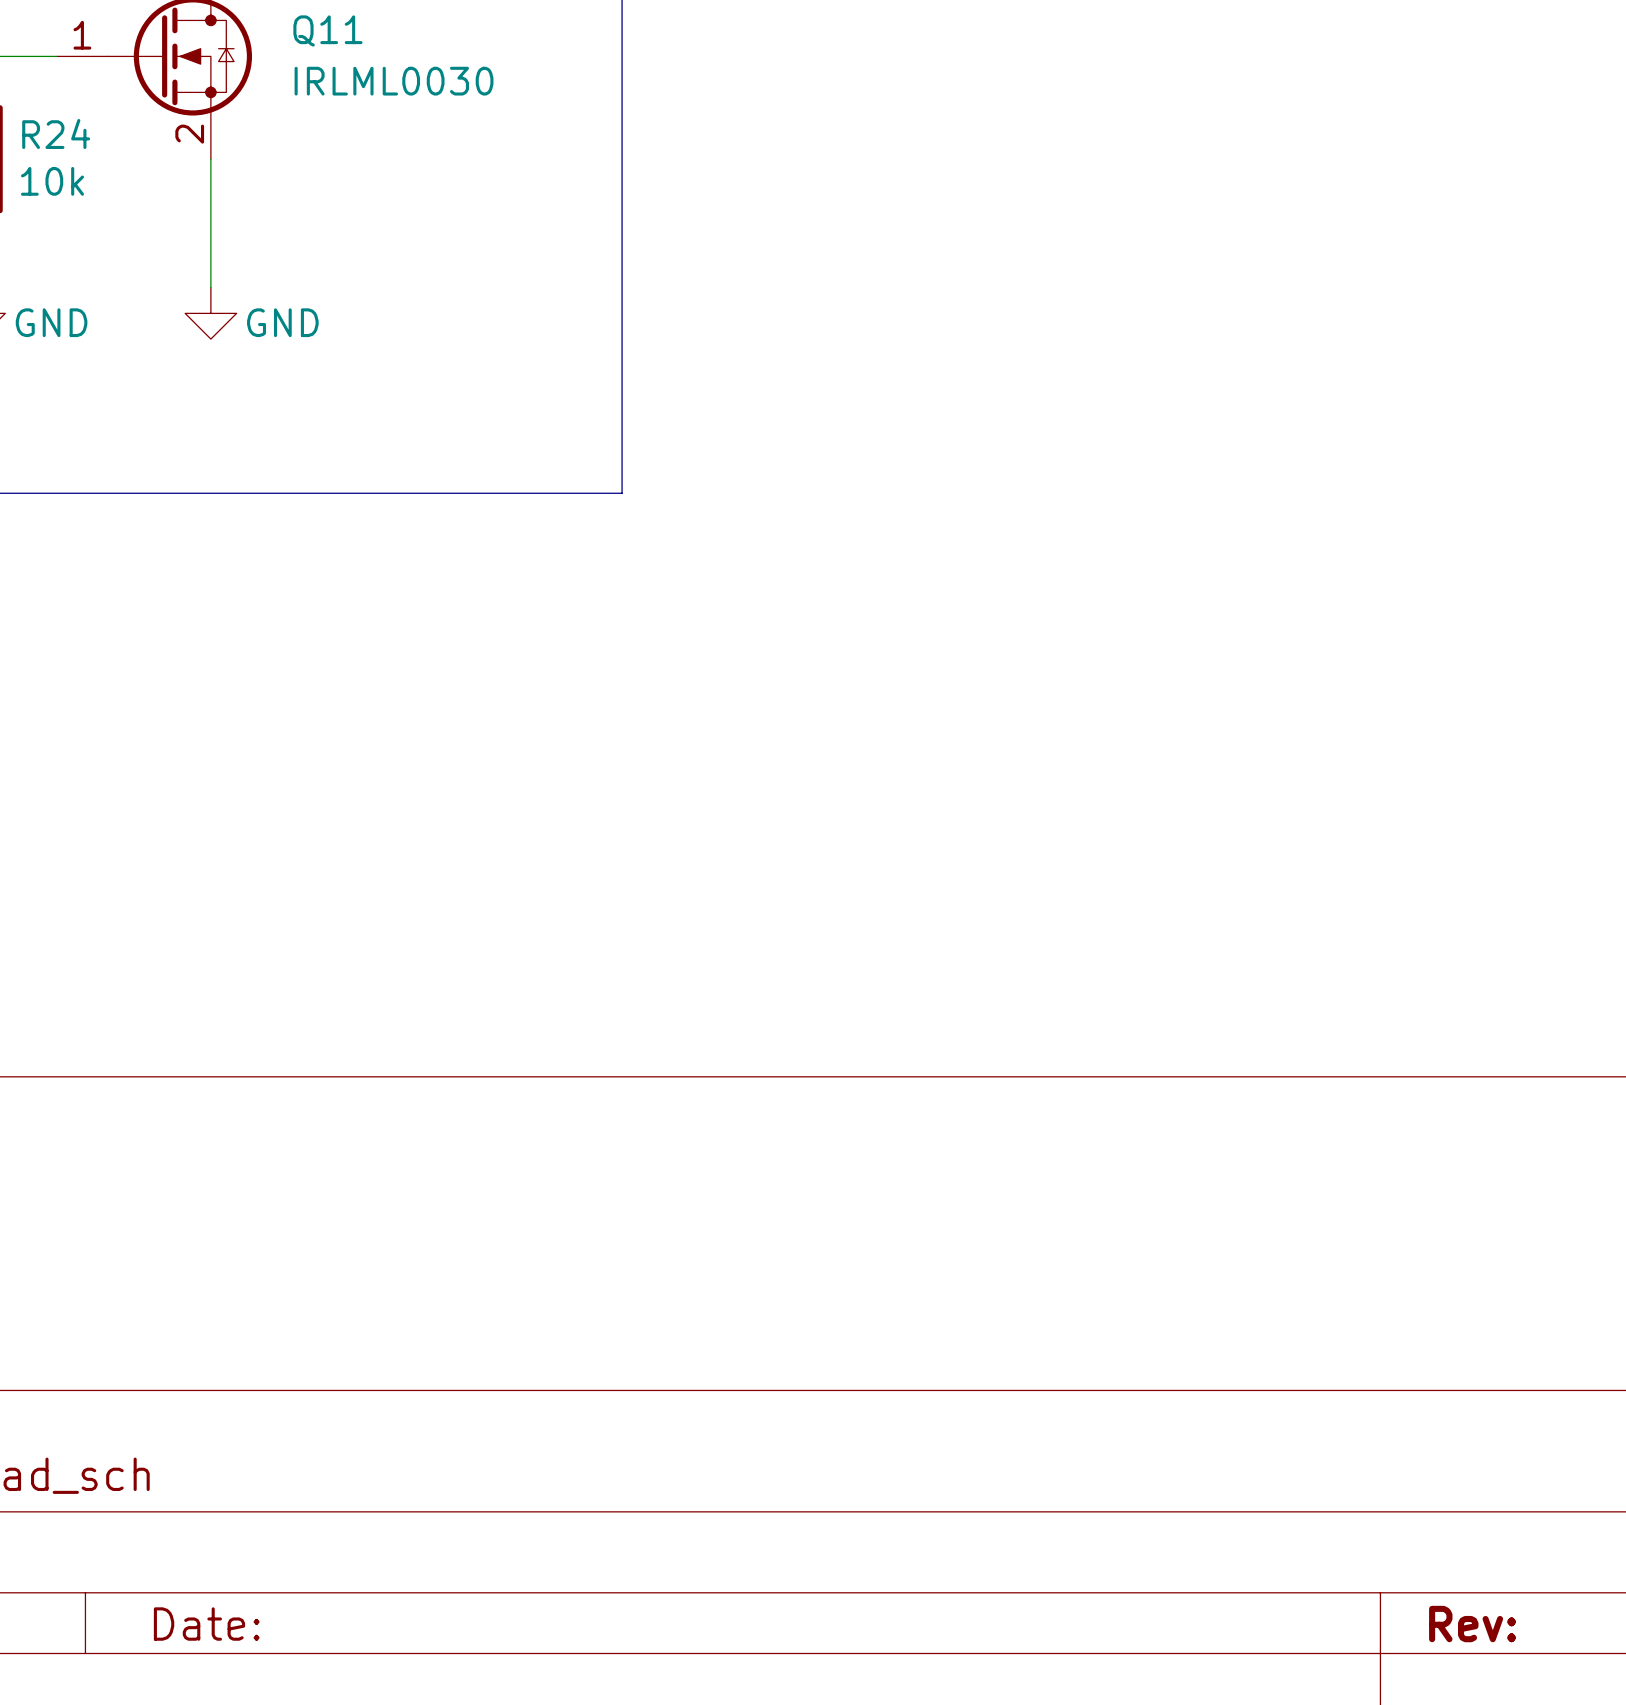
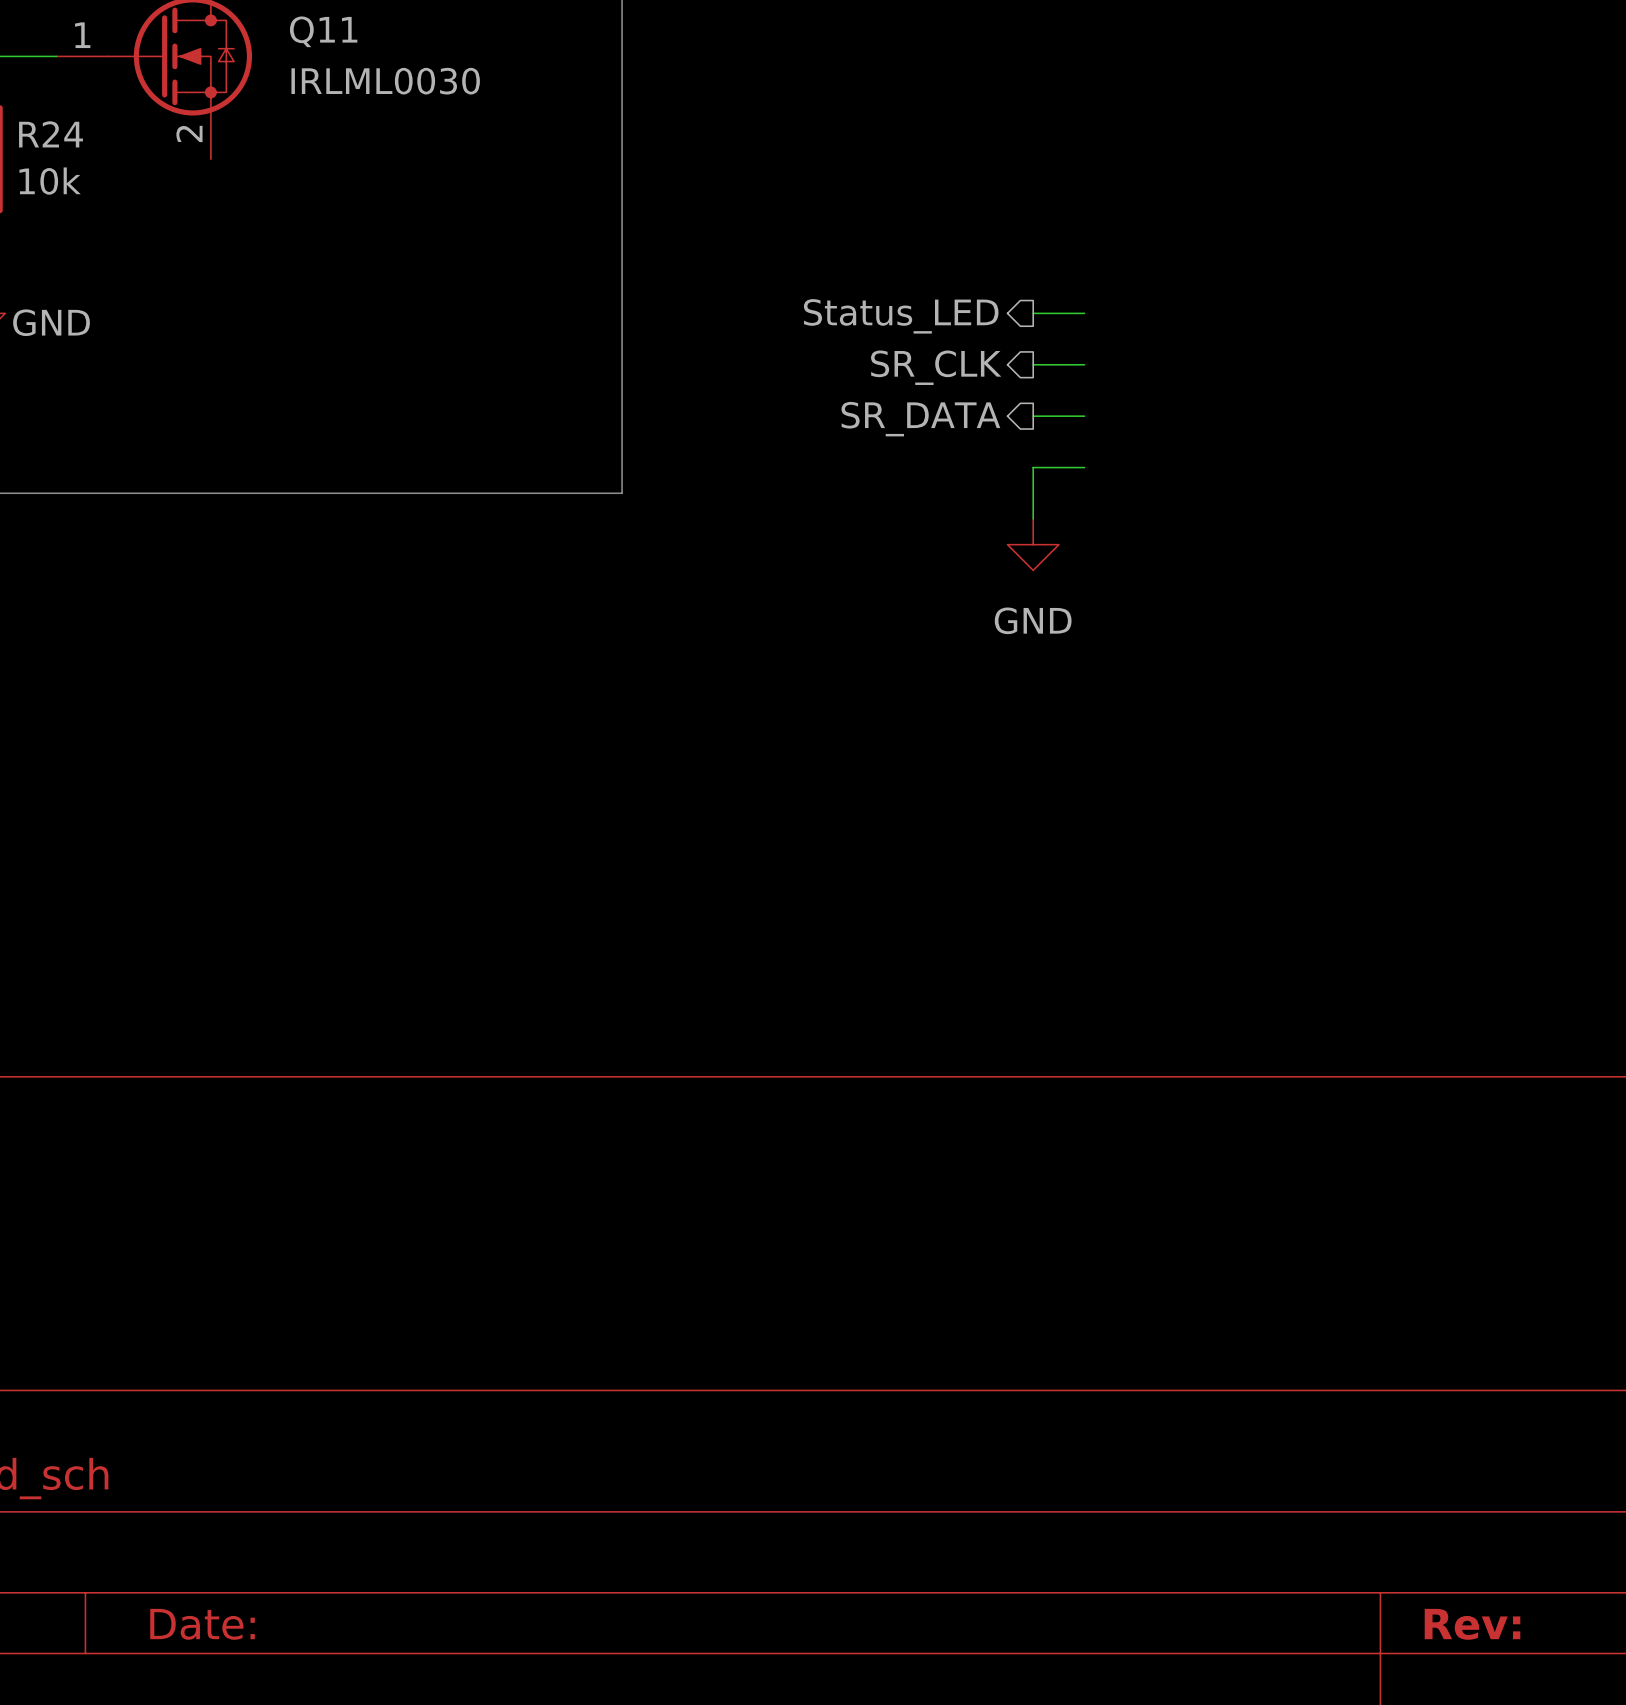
wire: (210, 159) (210, 287) -> none
power symbol: GND (210, 313) -> none
hierarchical label: none -> Status_LED (901, 316)
wire: none -> (1033, 313) (1084, 313)
wire: none -> (1033, 364) (1084, 364)
hierarchical label: none -> SR_CLK (936, 367)
hierarchical label: none -> SR_DATA (920, 419)
wire: none -> (1033, 416) (1084, 416)
wire: none -> (1084, 467) (1033, 467) (1033, 518)
power symbol: none -> GND (1033, 544)

